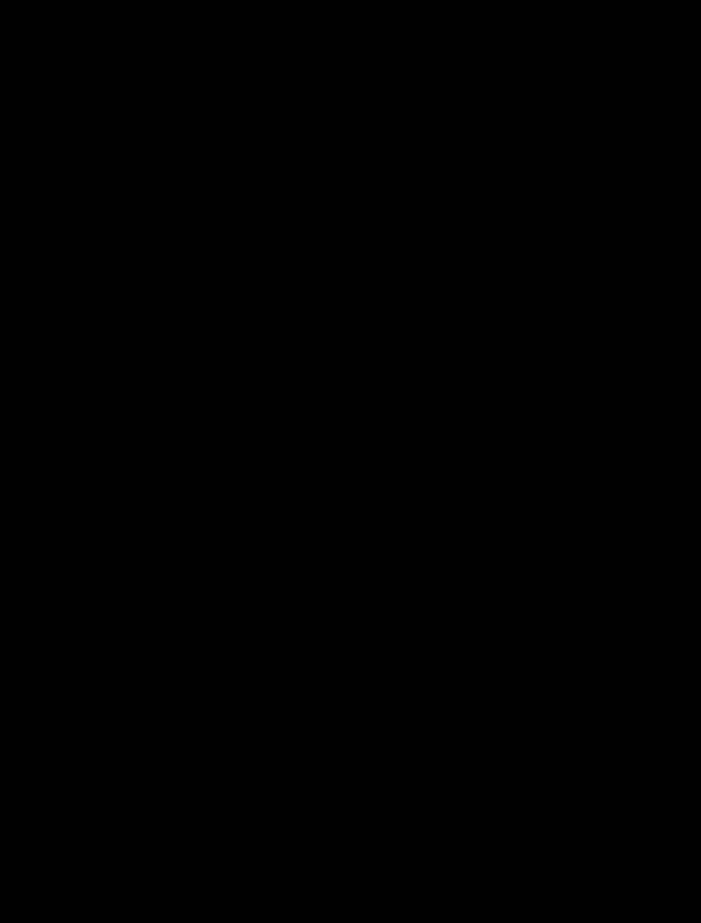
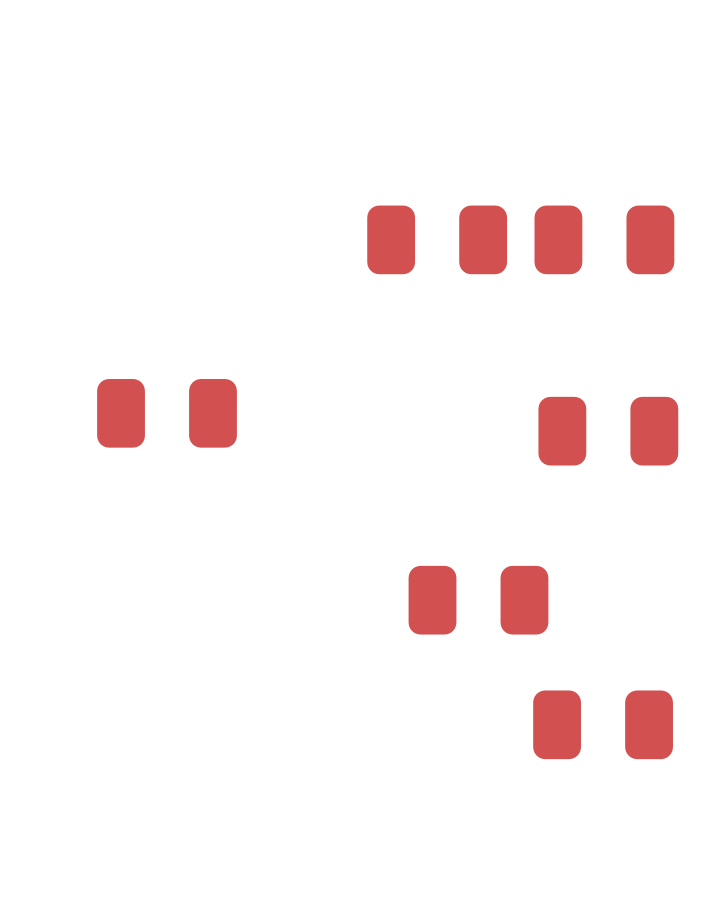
part: none -> (437, 239)
part: none -> (604, 239)
part: none -> (167, 413)
part: none -> (608, 431)
part: none -> (478, 600)
part: none -> (603, 724)

